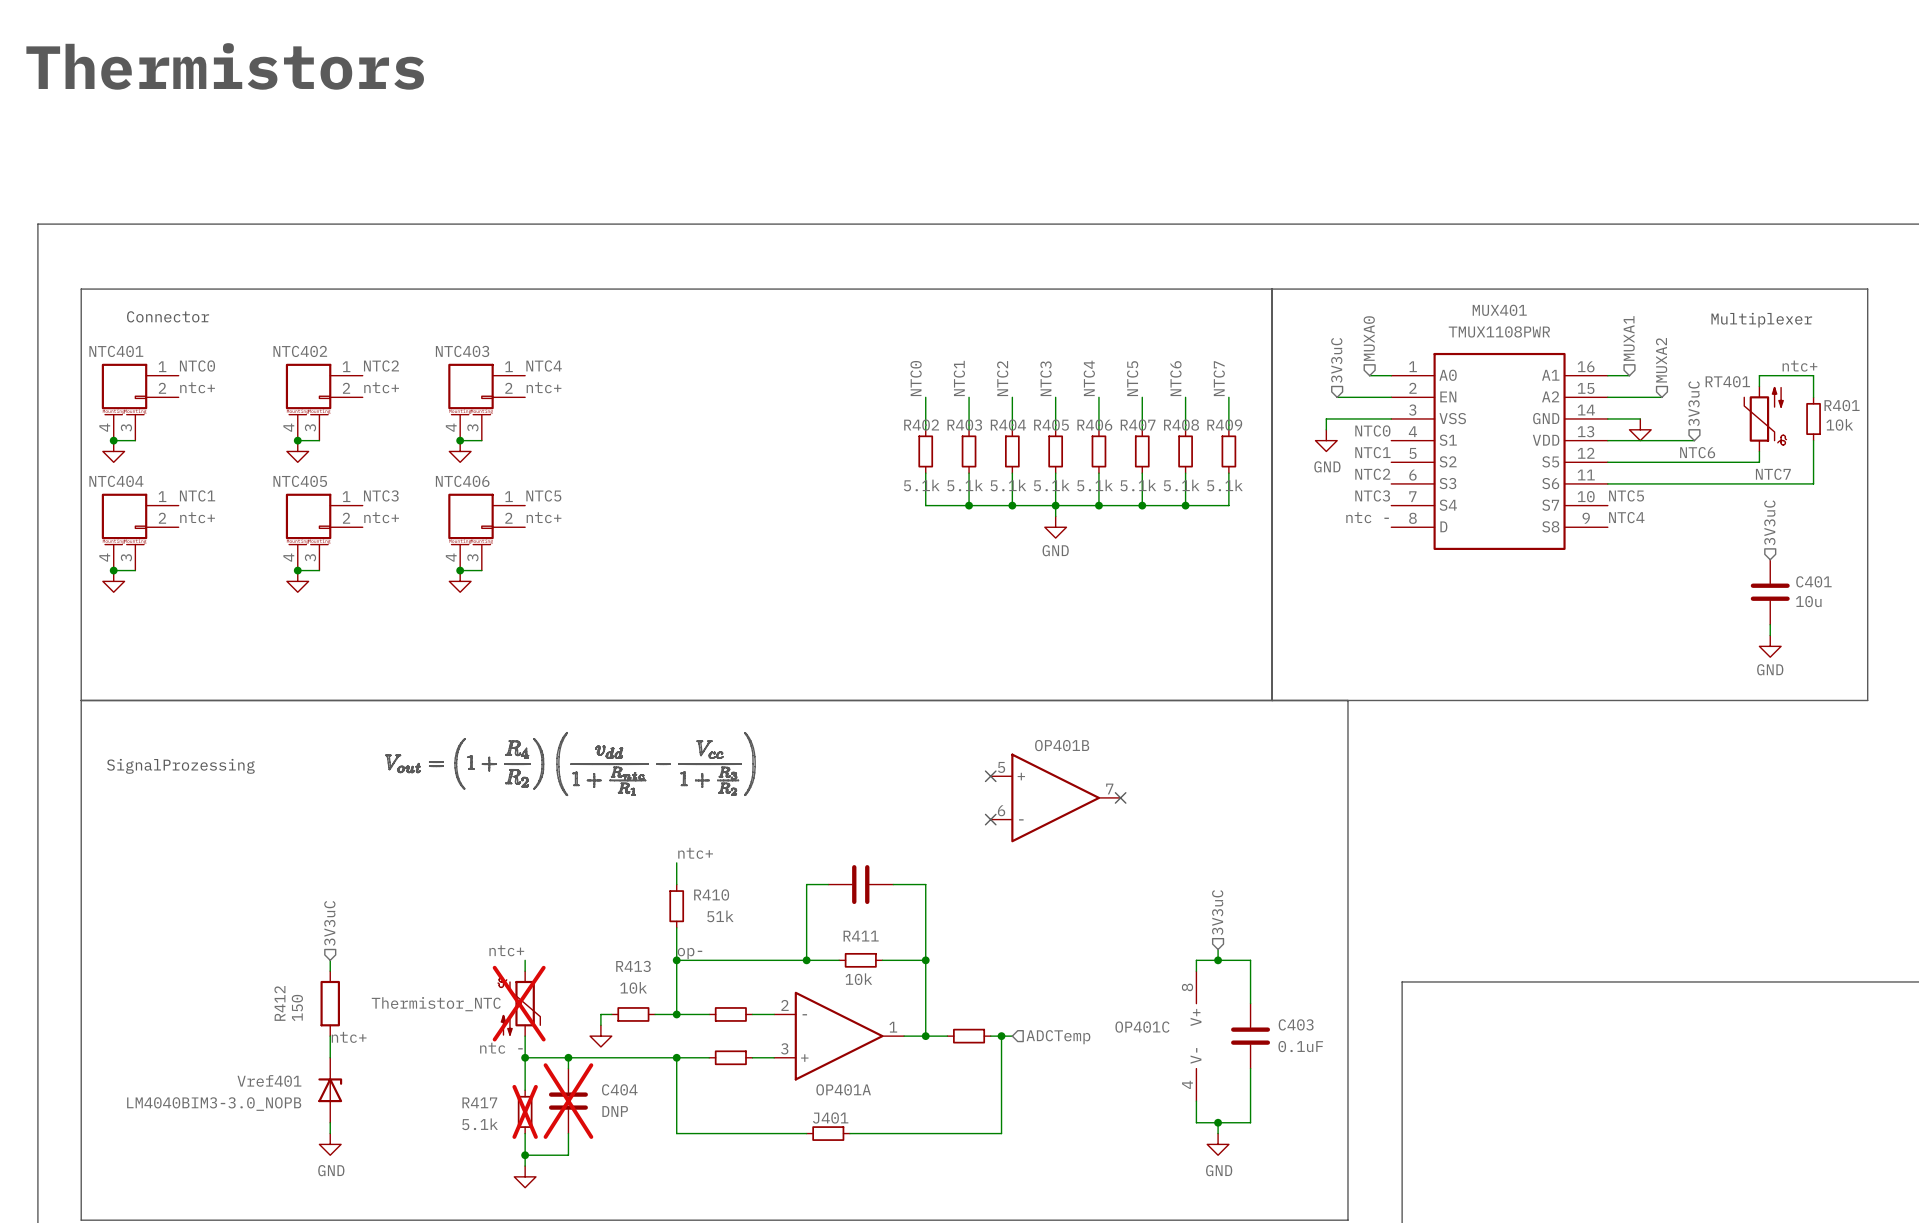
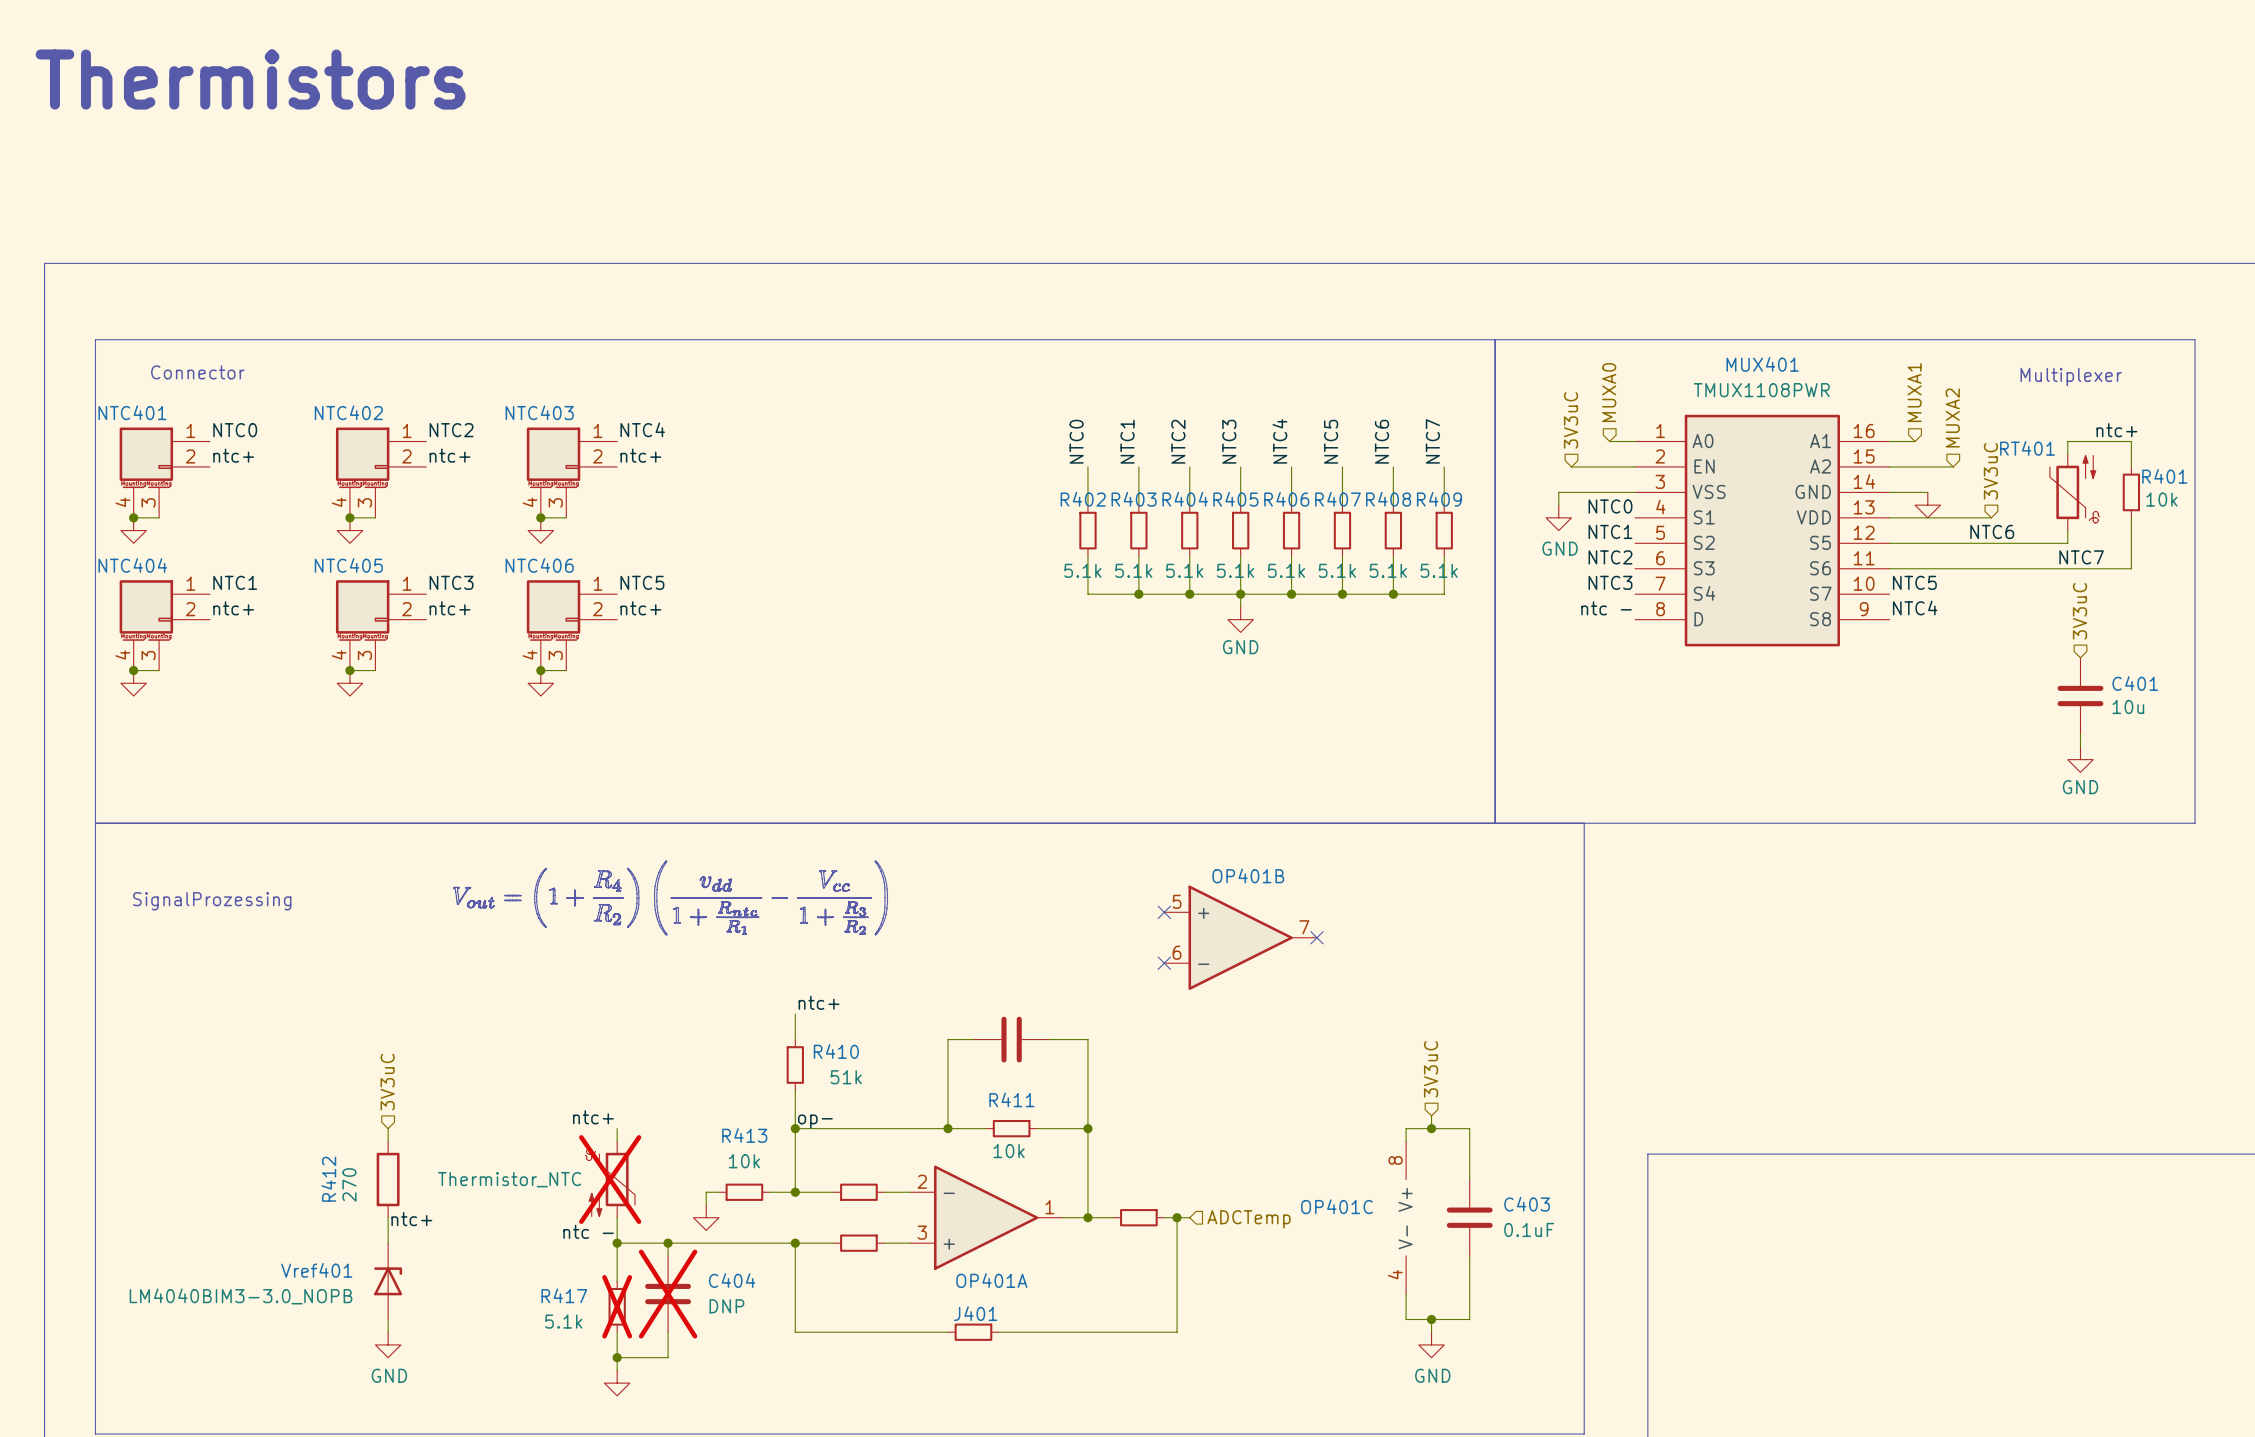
R412 value: 150 (297, 1008) -> 270 (349, 1184)

